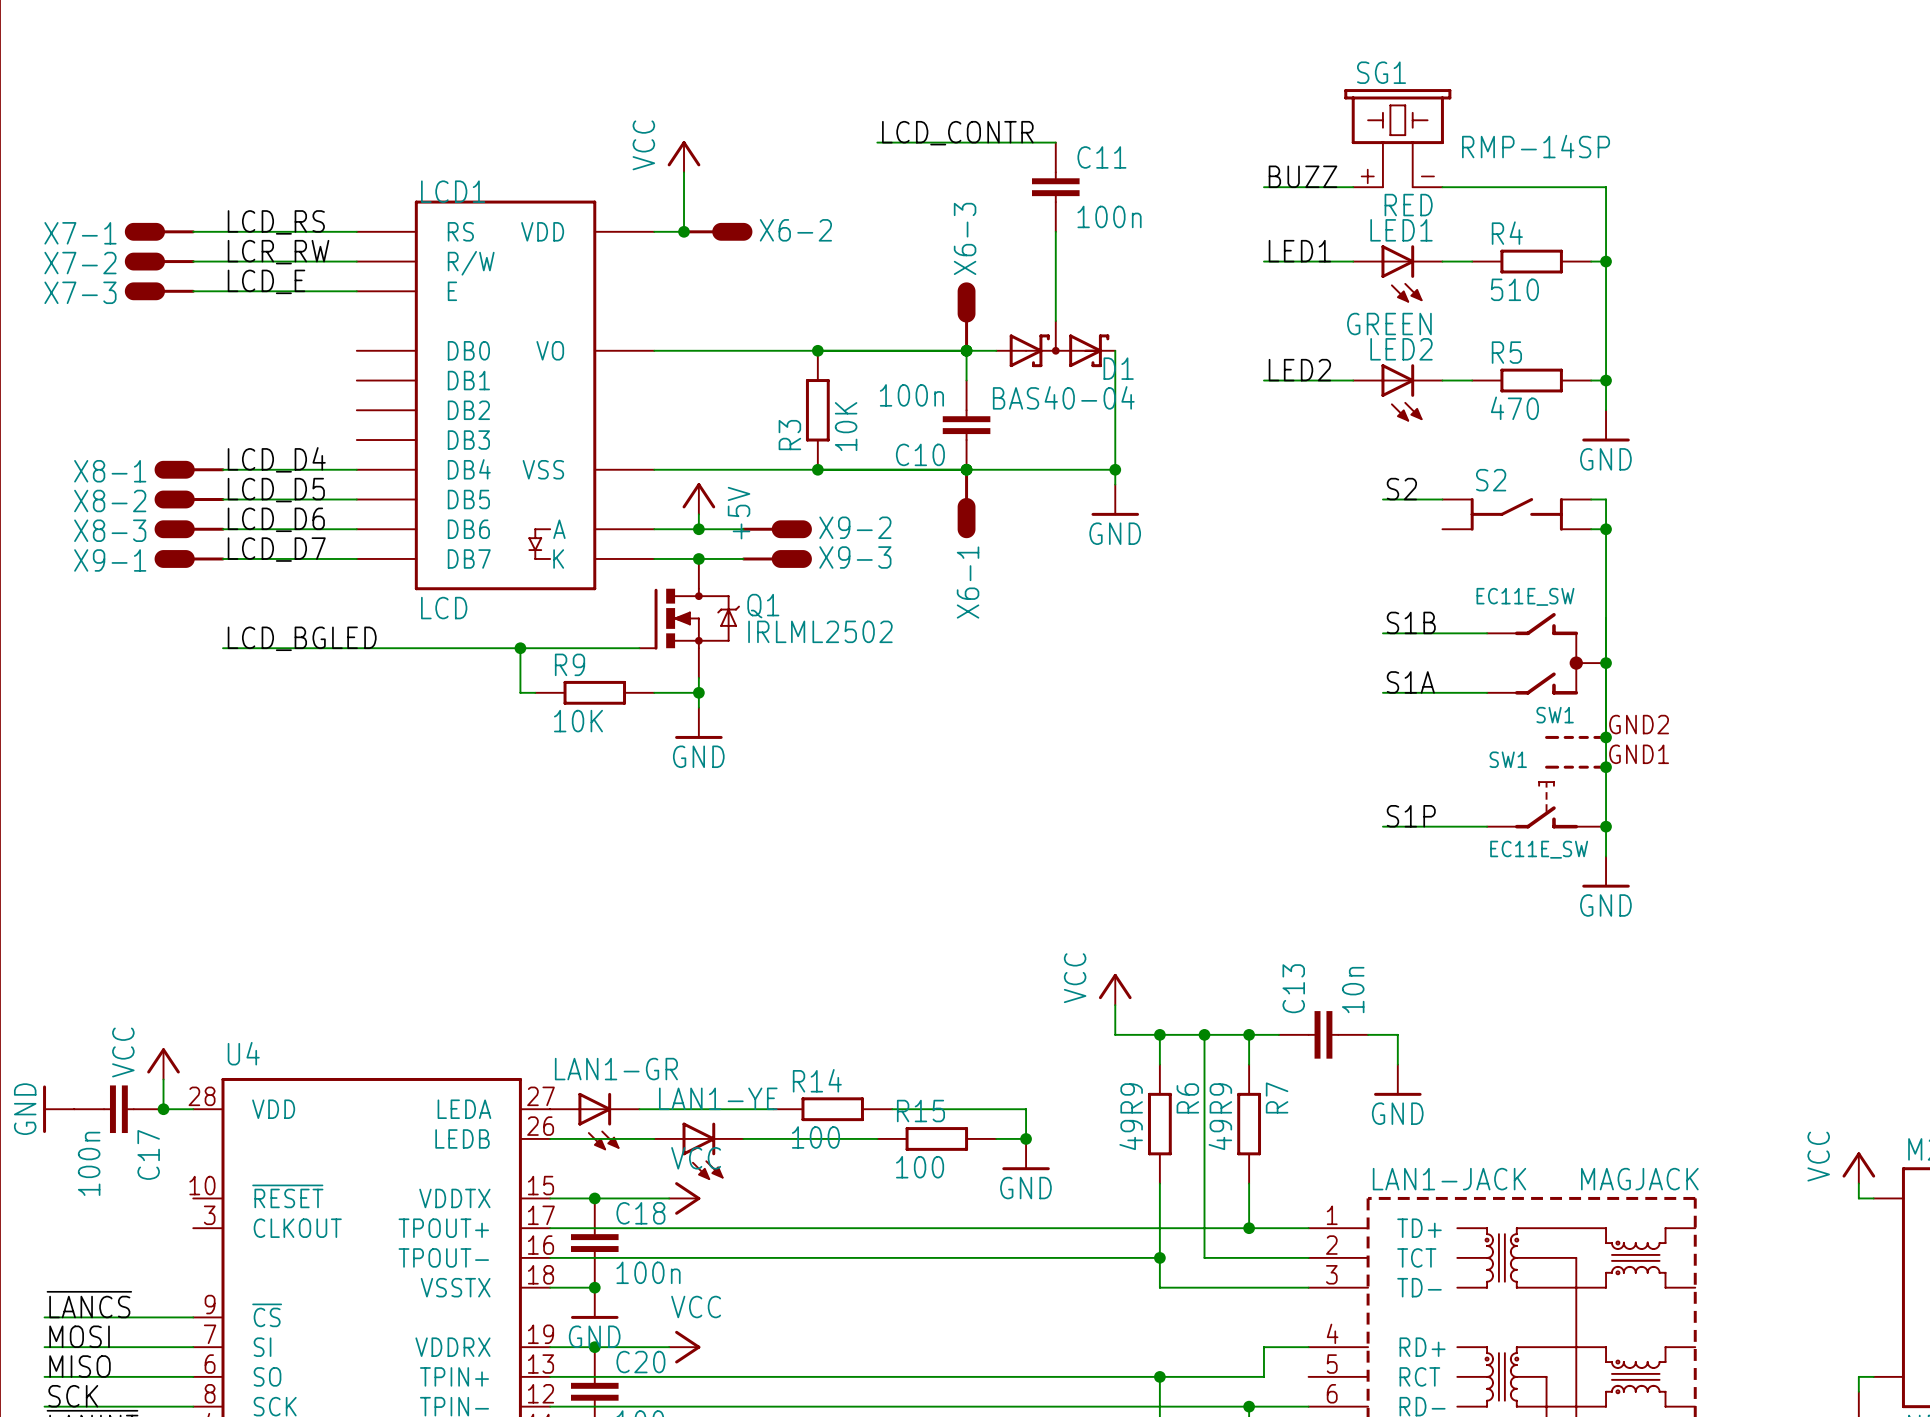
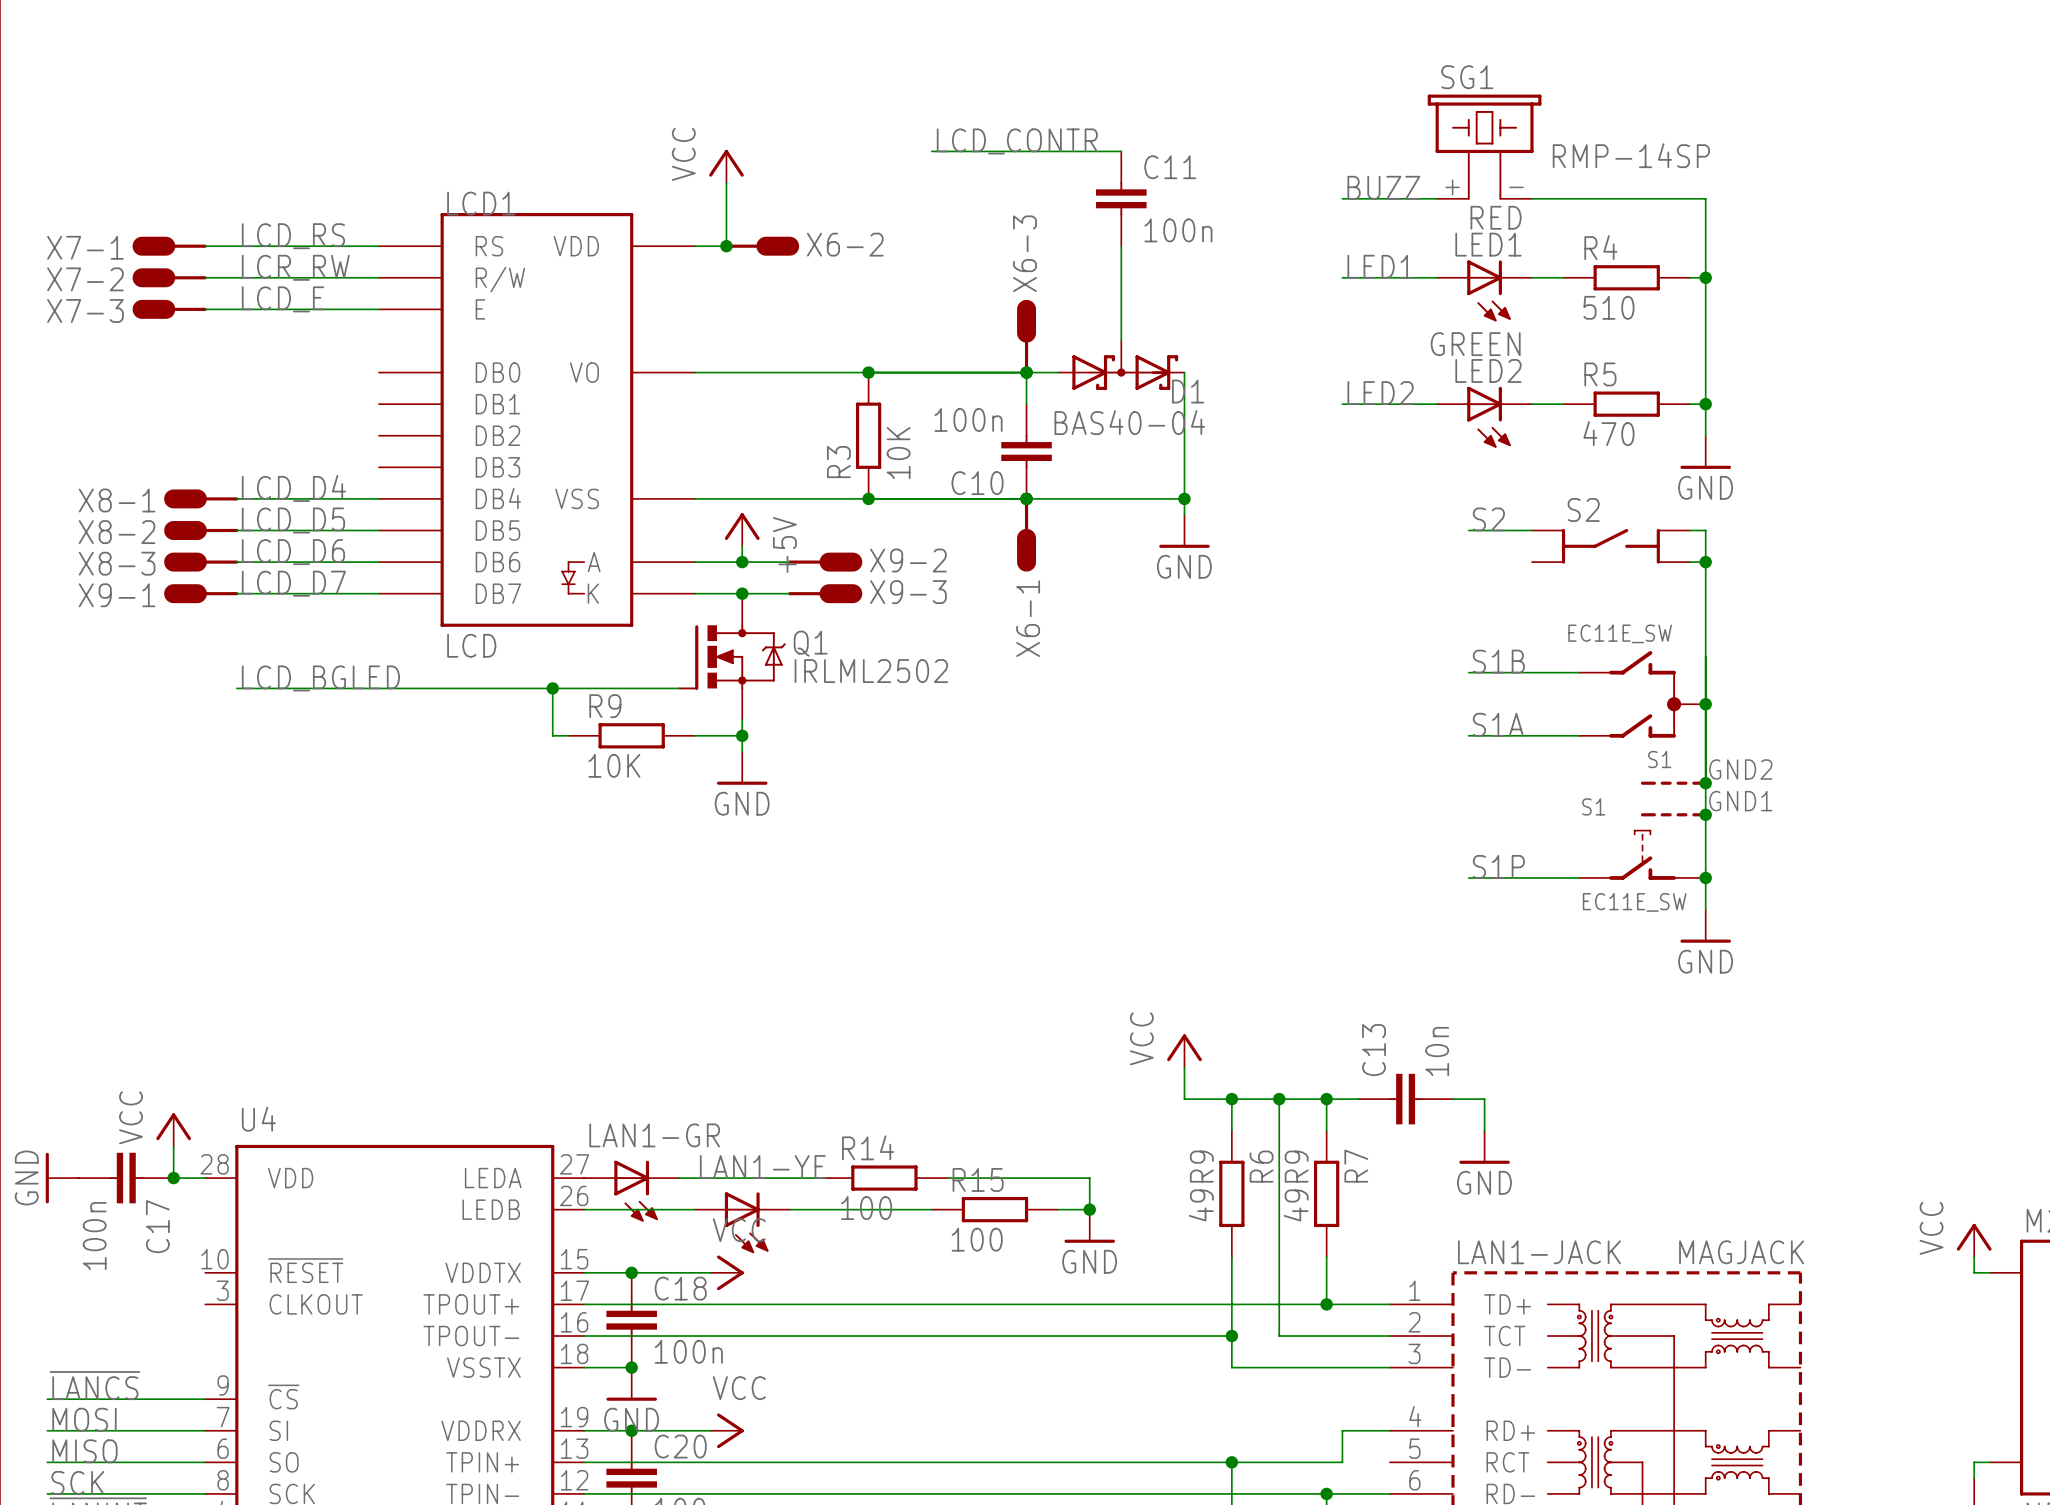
SW1 name: SW1 (1555, 715) -> S1 (1659, 759)
SW1 name: SW1 (1508, 759) -> S1 (1593, 806)

